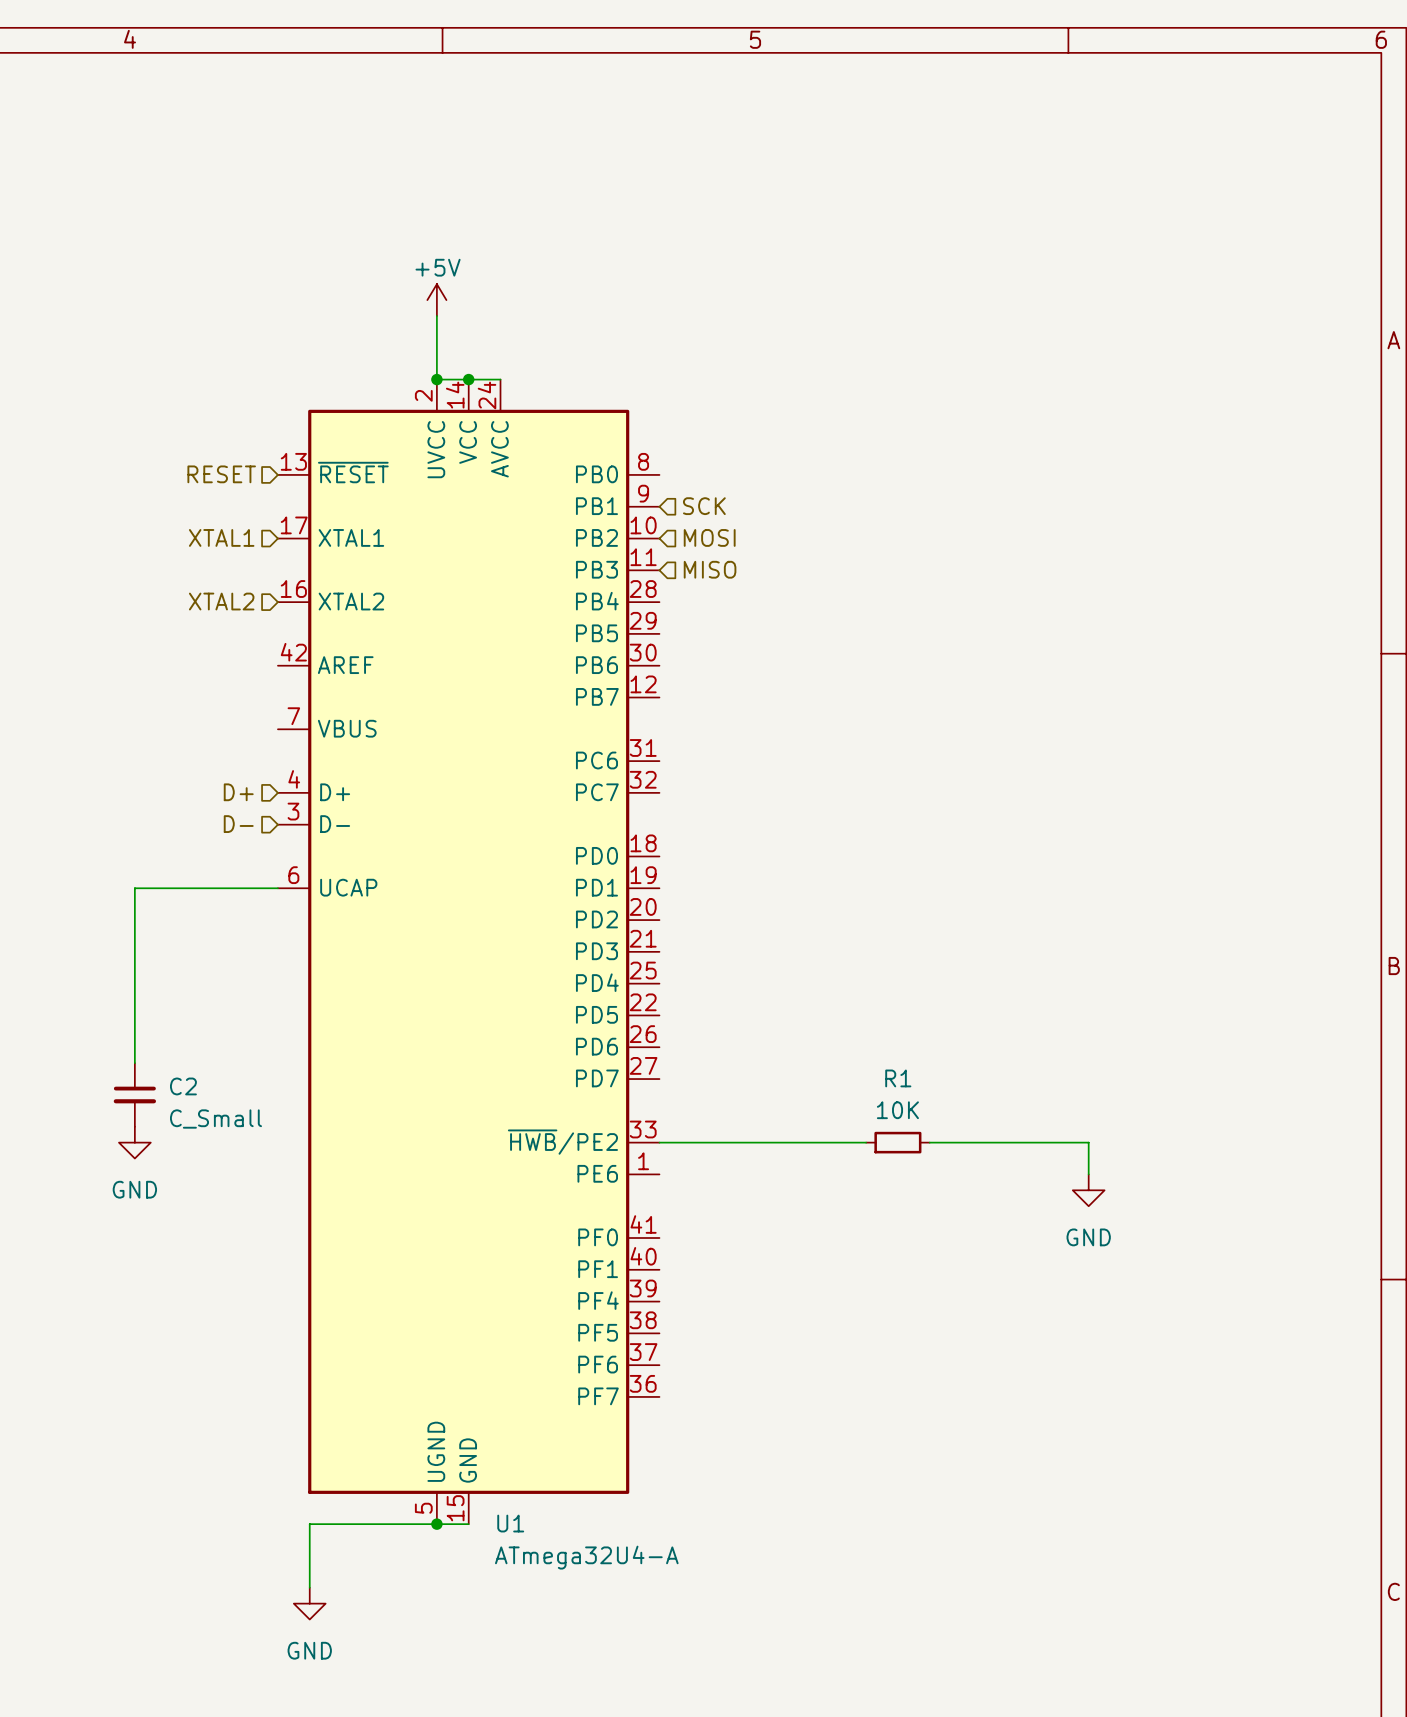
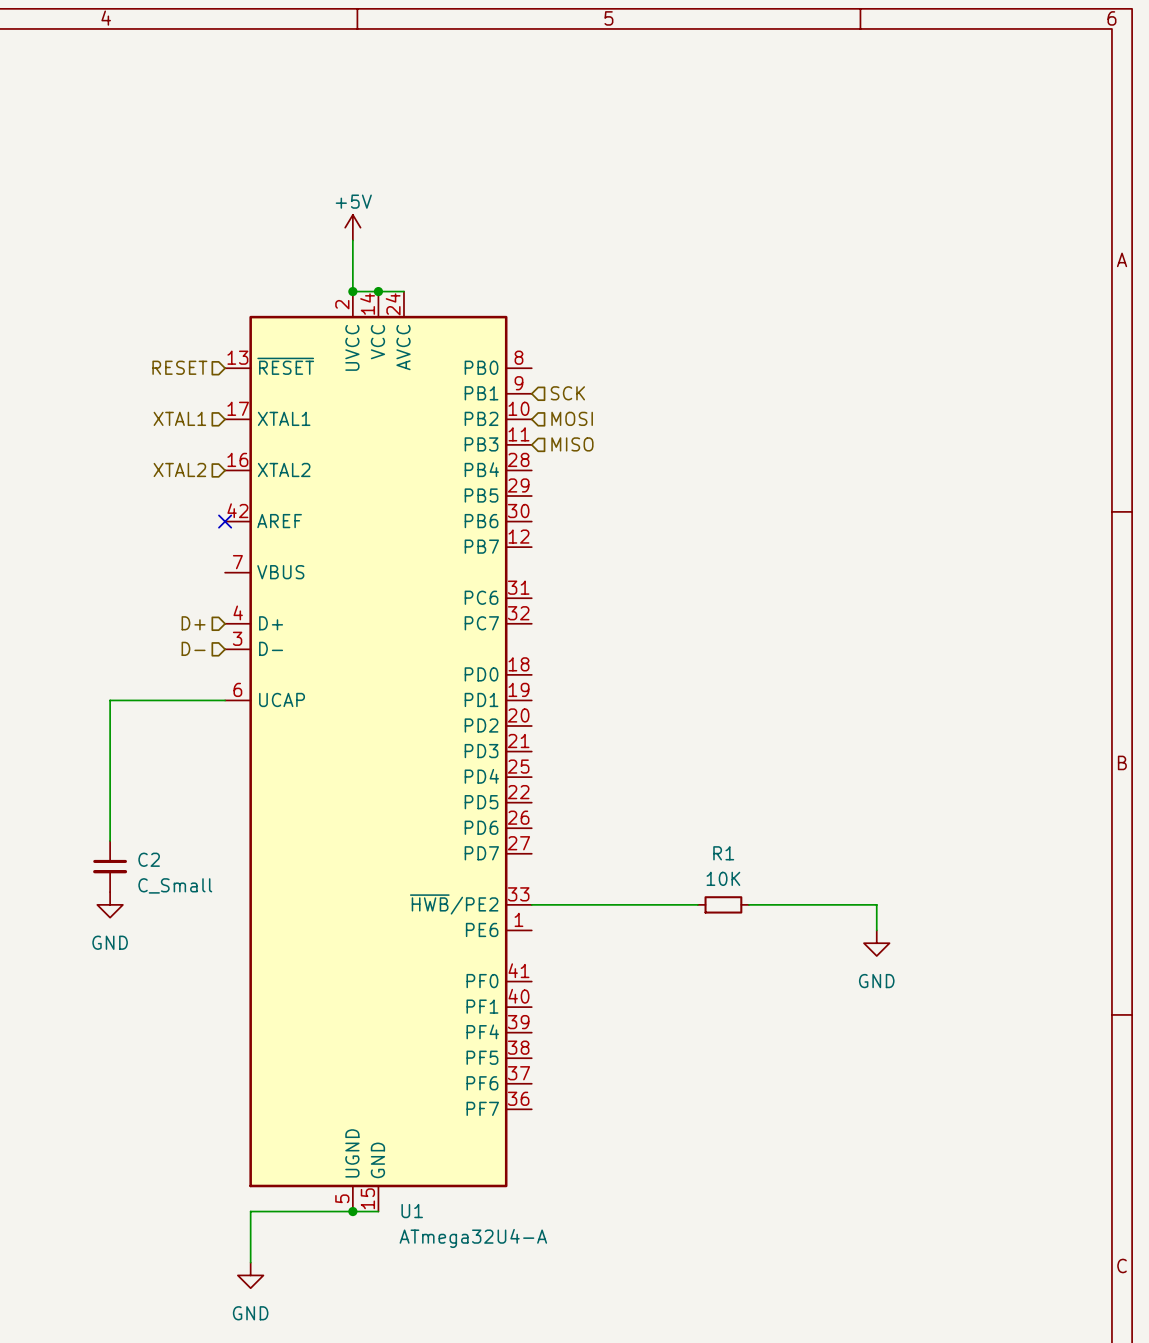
no-connect mark: none -> (225, 521)

